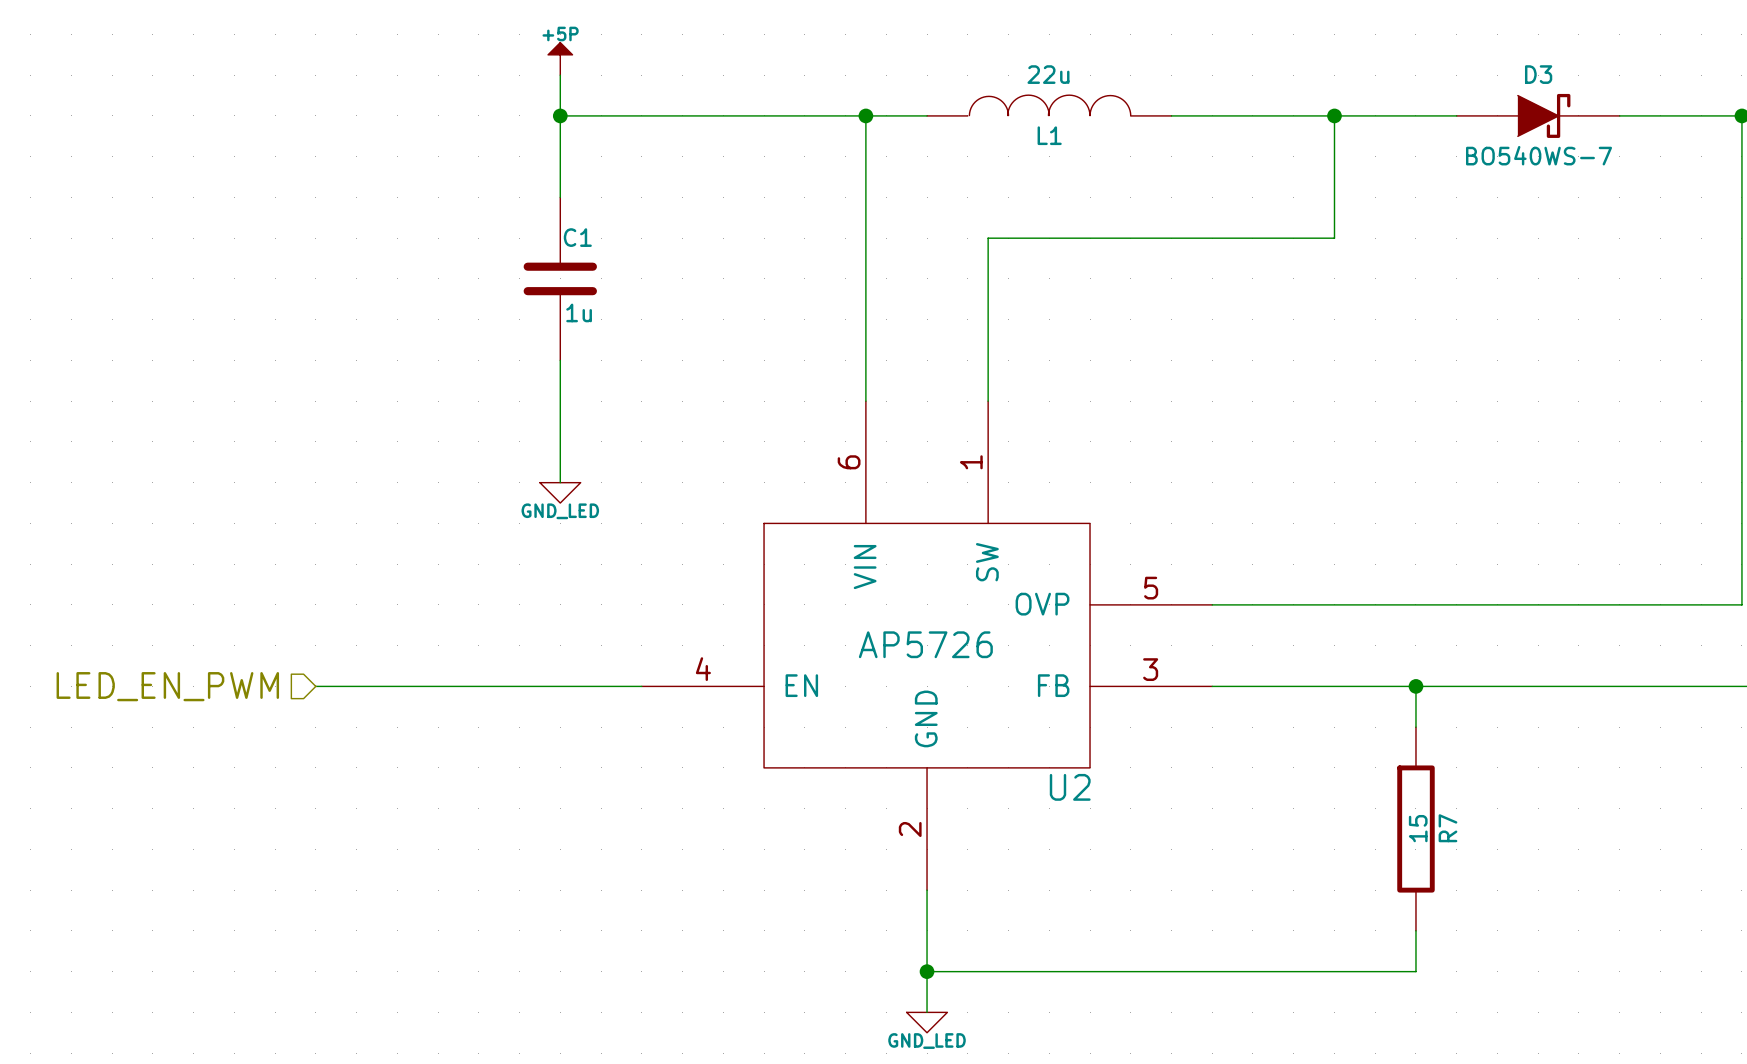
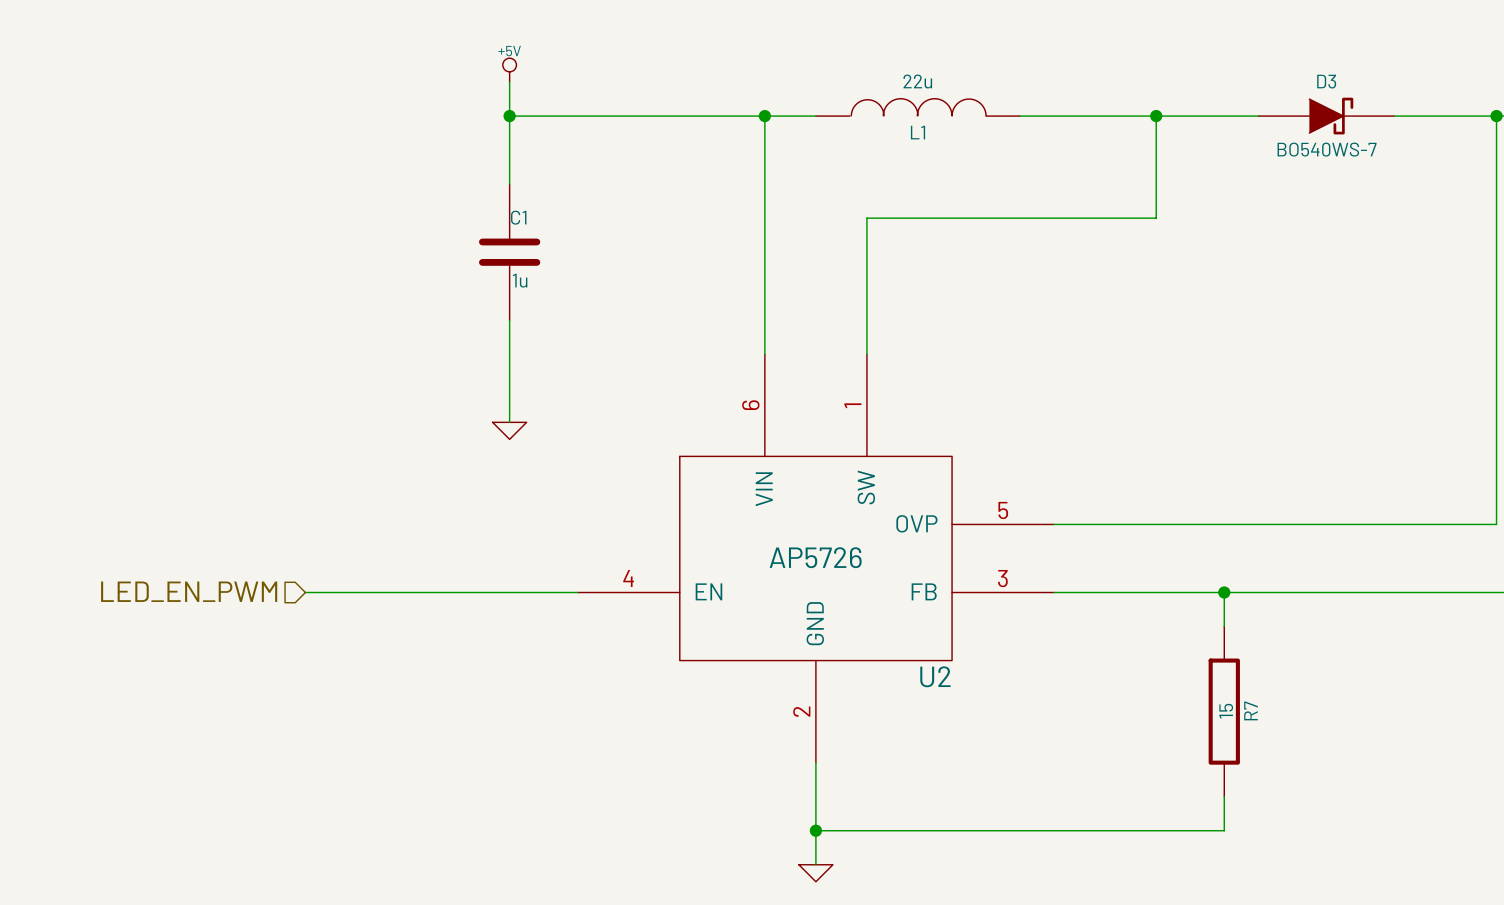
power symbol: +5P (560, 58) -> +5V (509, 70)
power symbol text: GND_LED (560, 511) -> none
power symbol text: GND_LED (927, 1041) -> none

